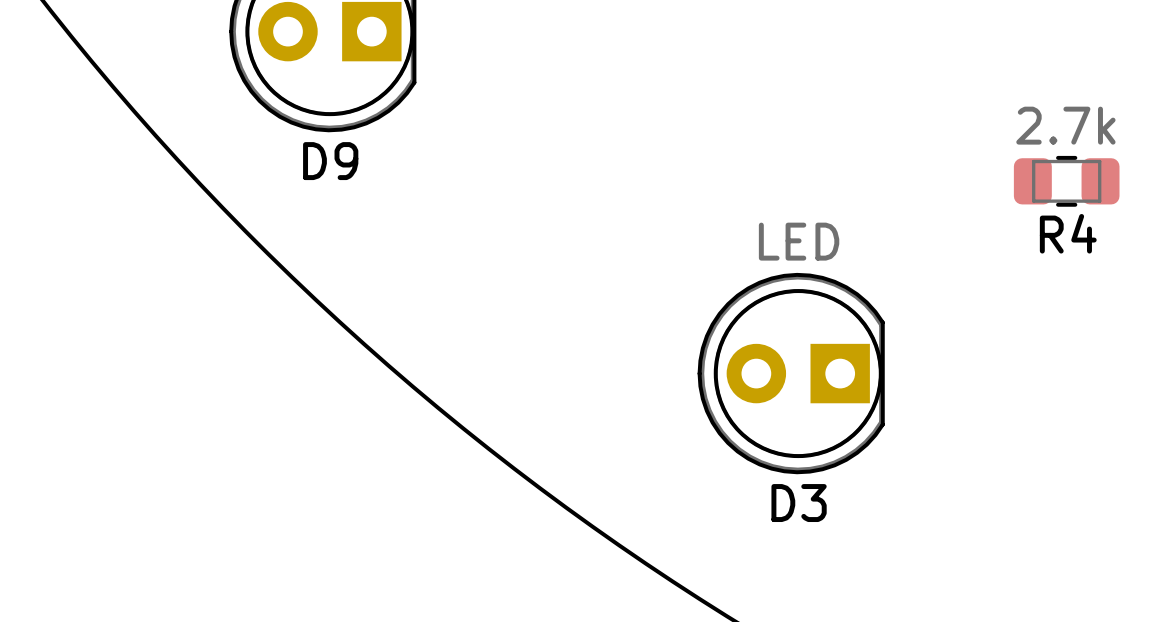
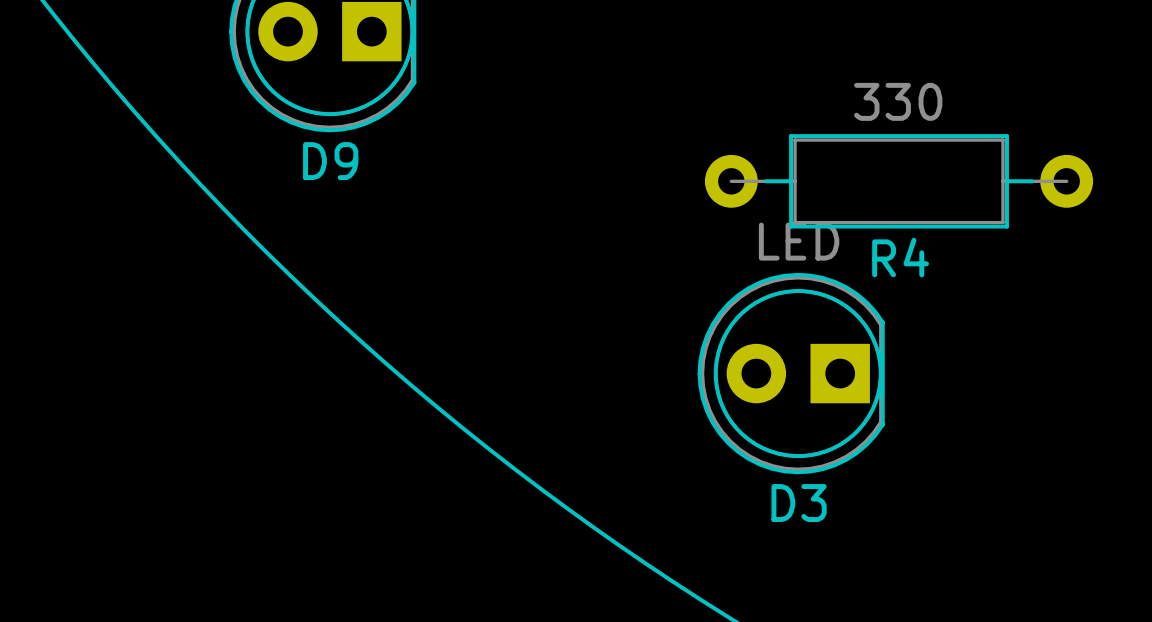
R4 value: 2.7k (1065, 125) -> 330 (898, 101)
R4 footprint: [1013, 155, 1120, 207] -> [704, 134, 1094, 229]

